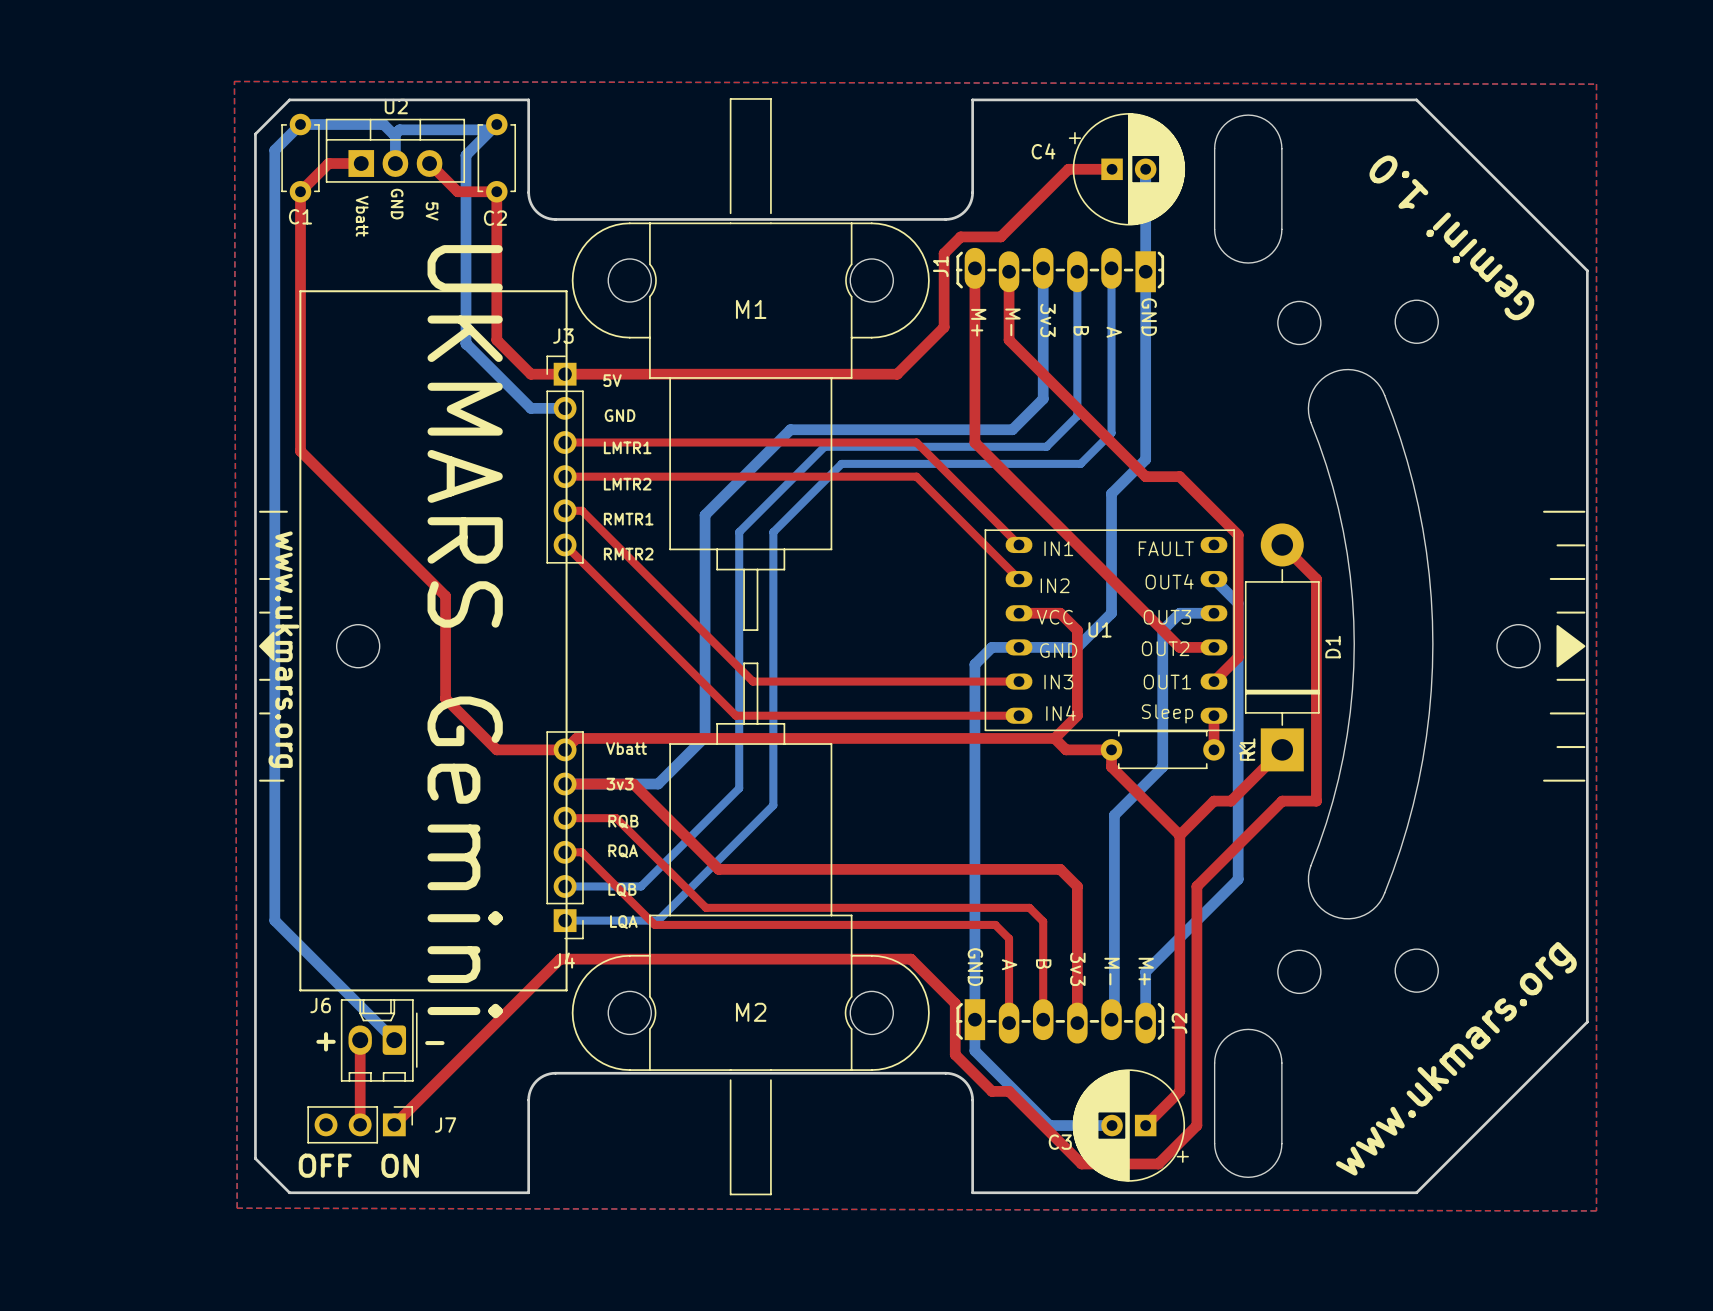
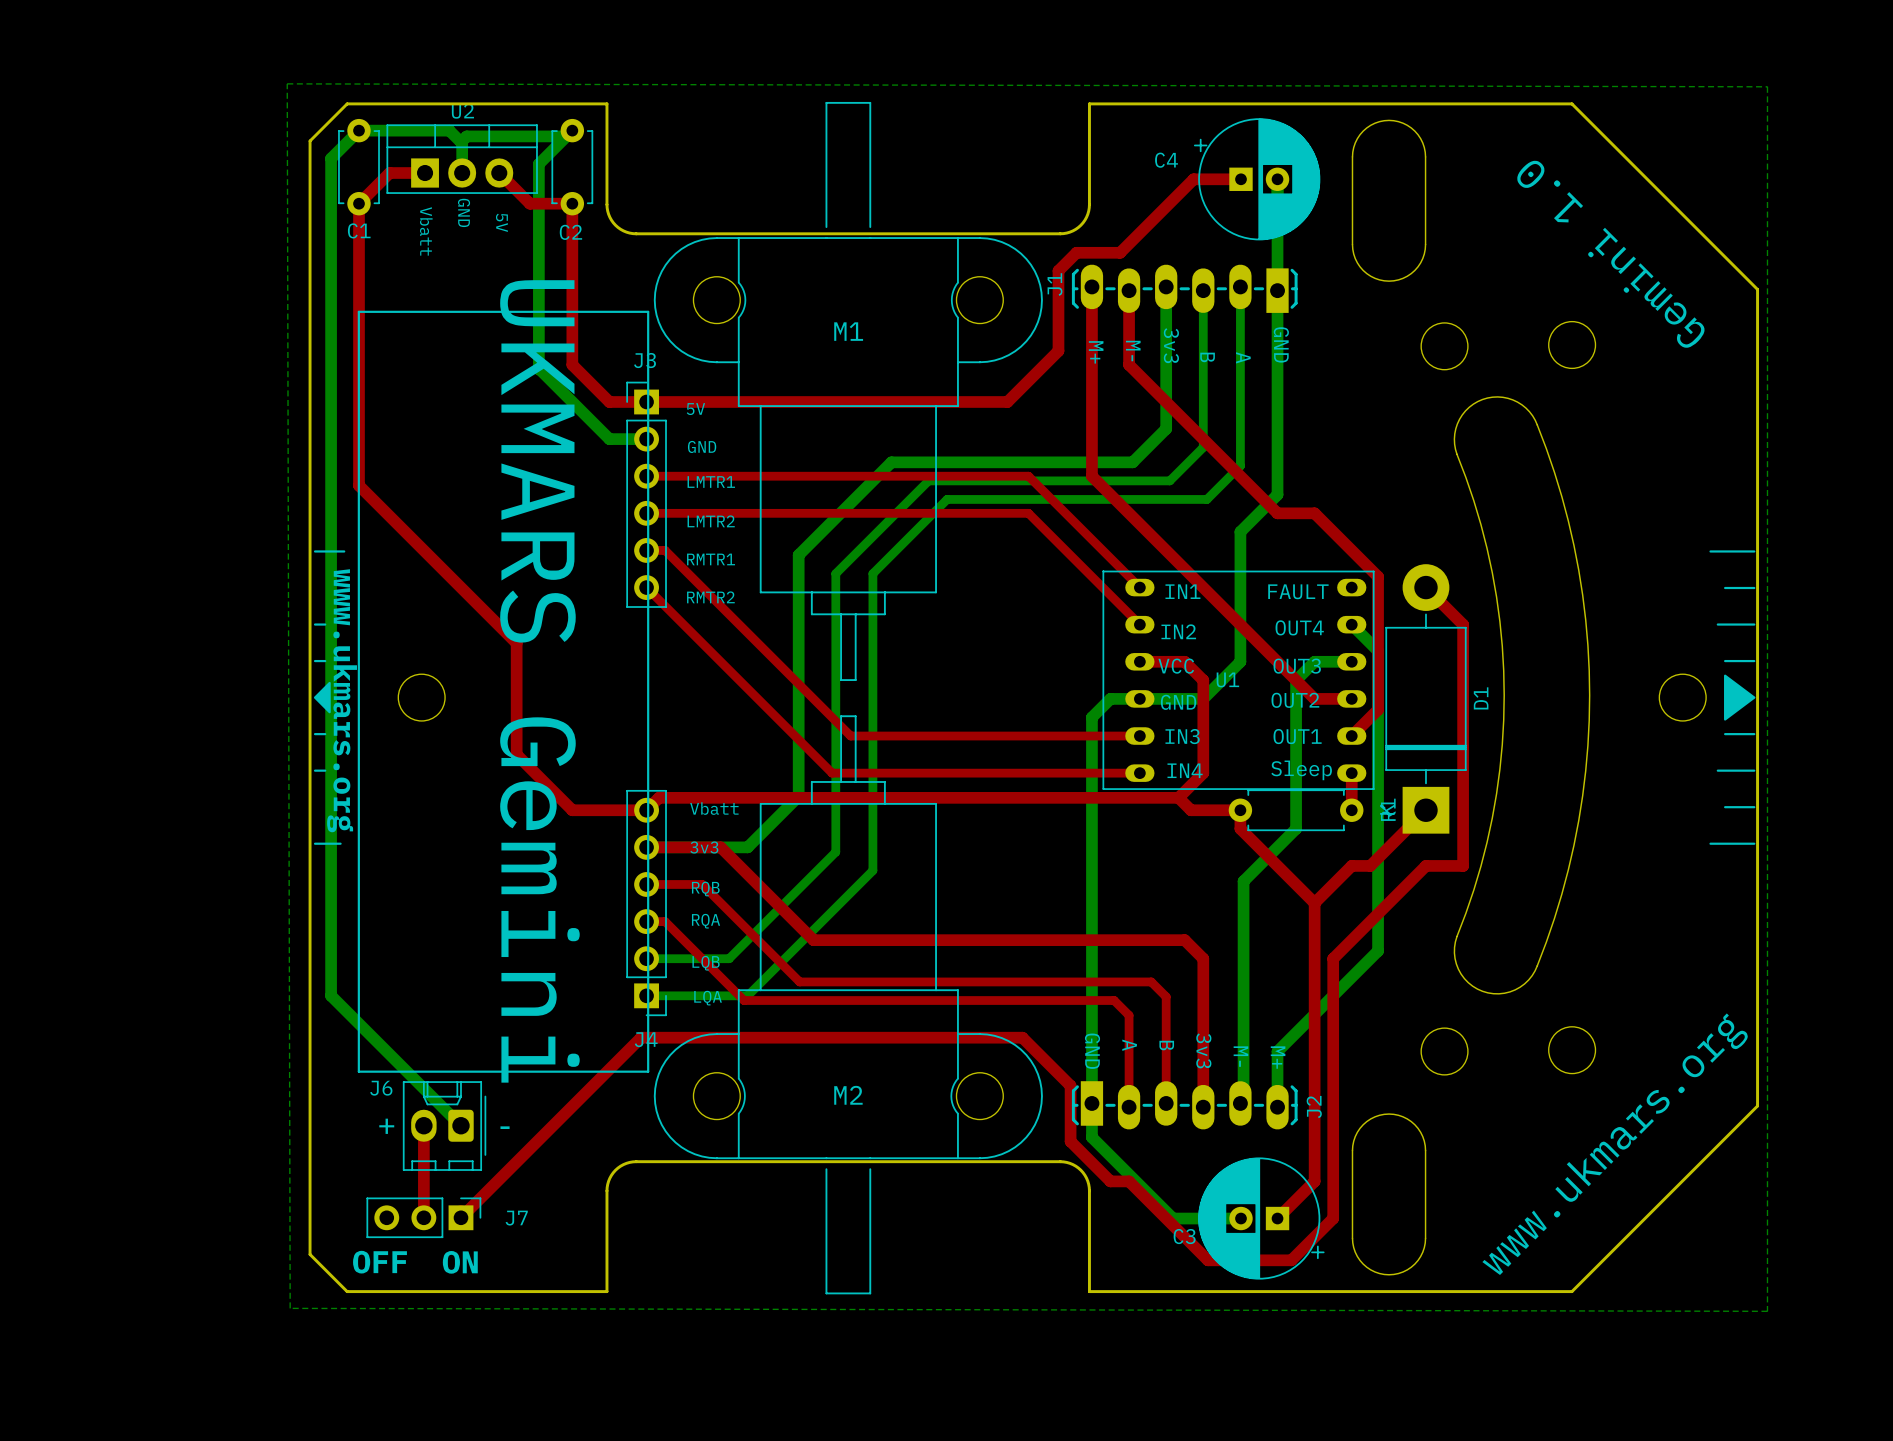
top zone outline: (234, 81) (237, 1208) (1596, 1210) (1596, 84) (234, 81) -> none

